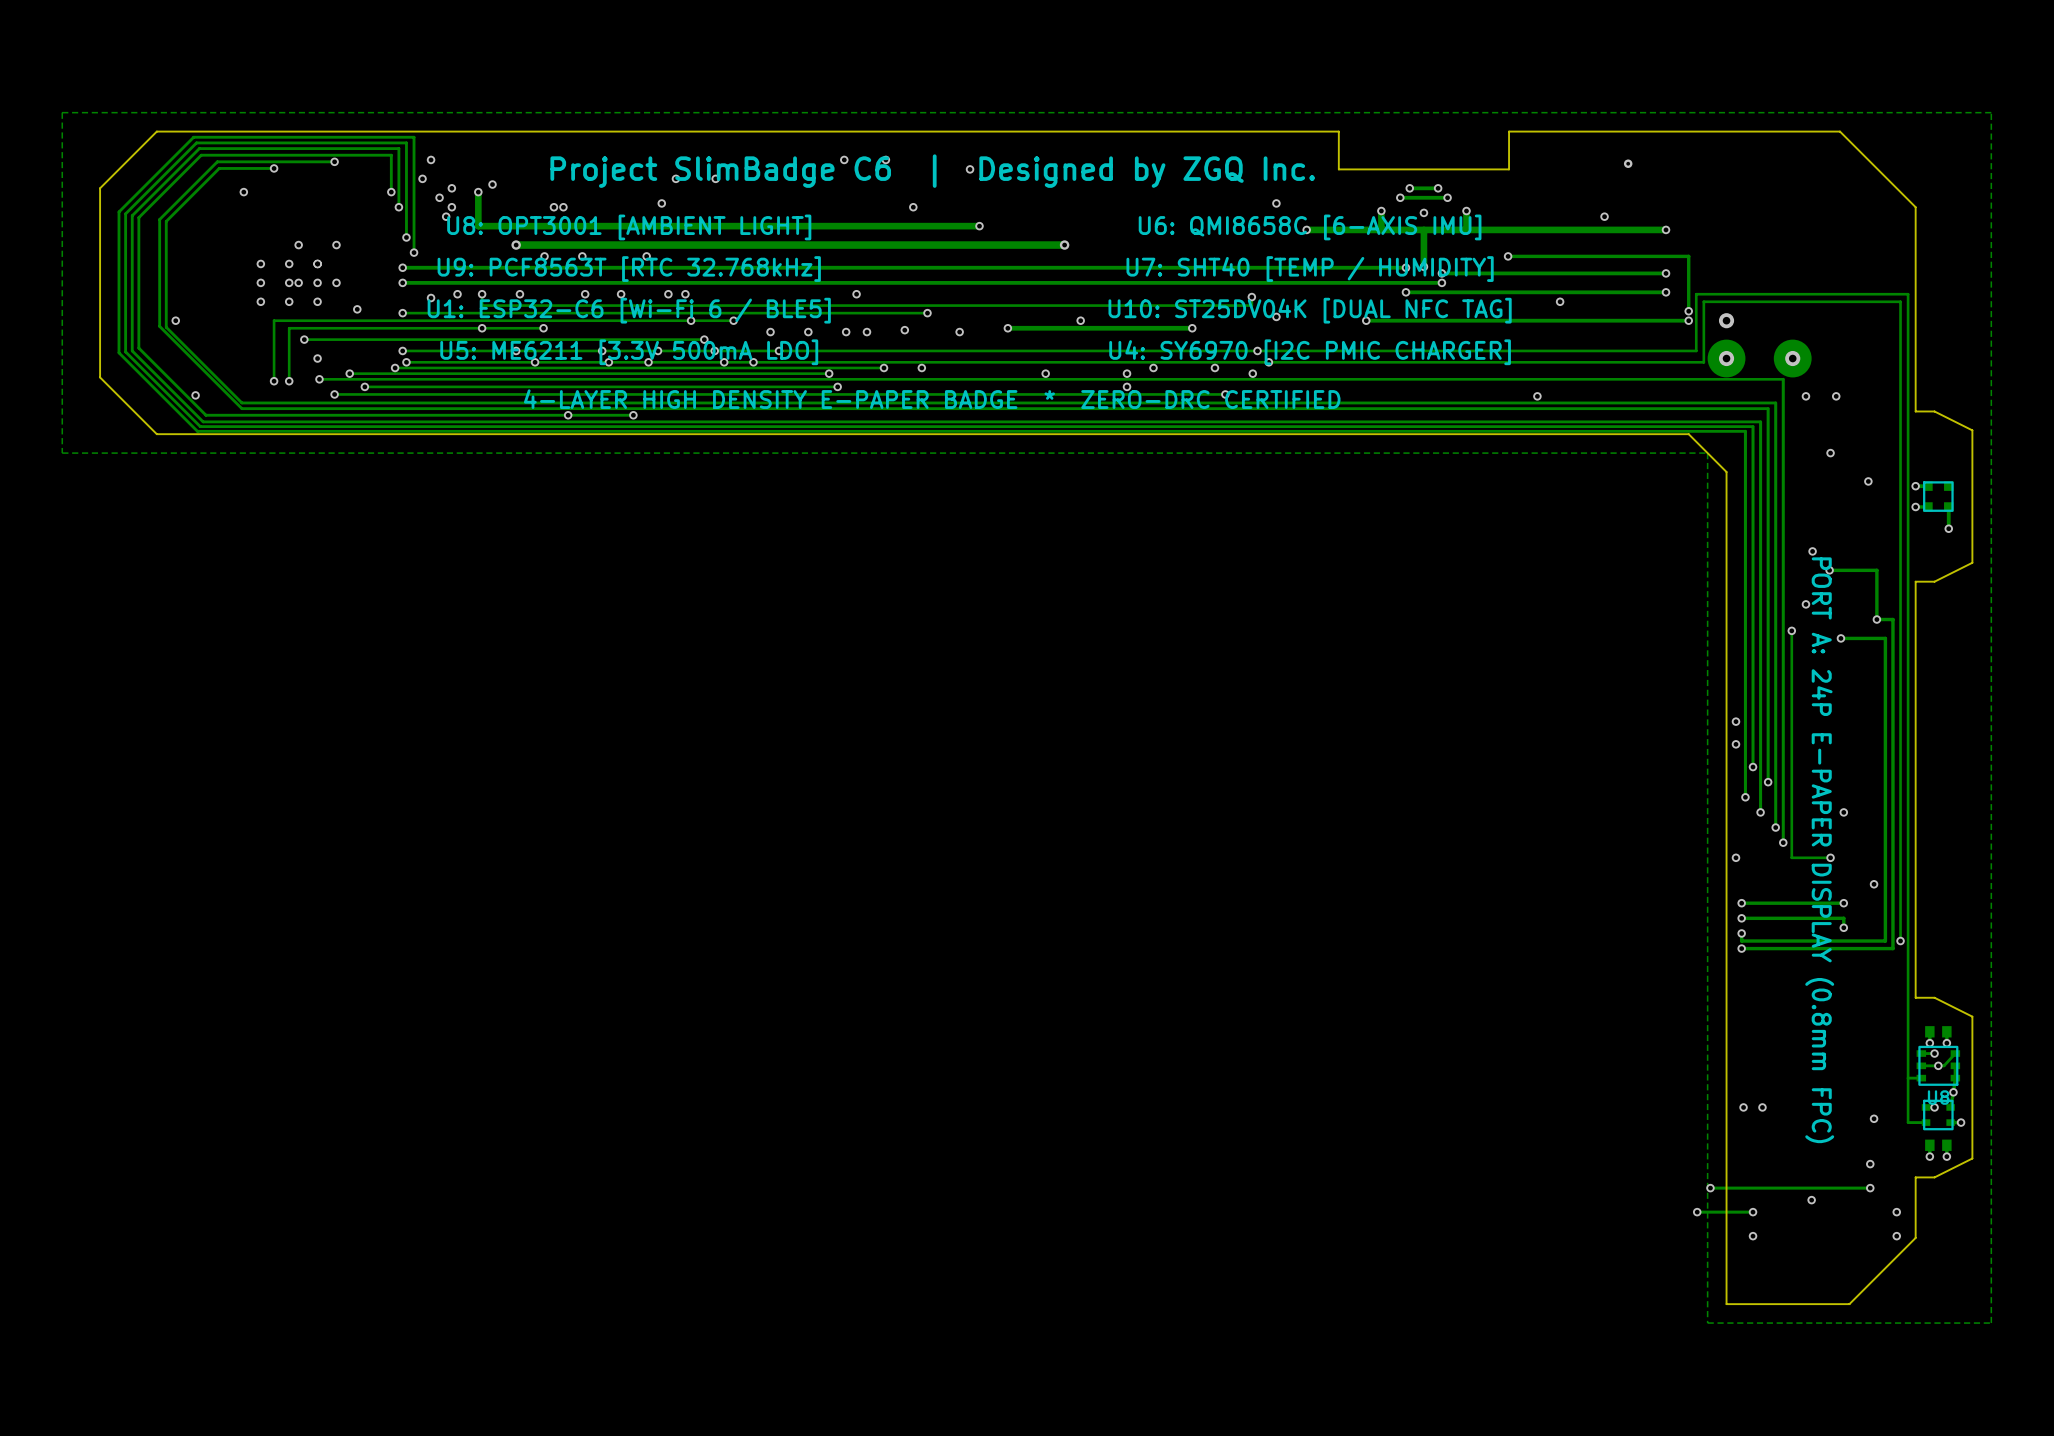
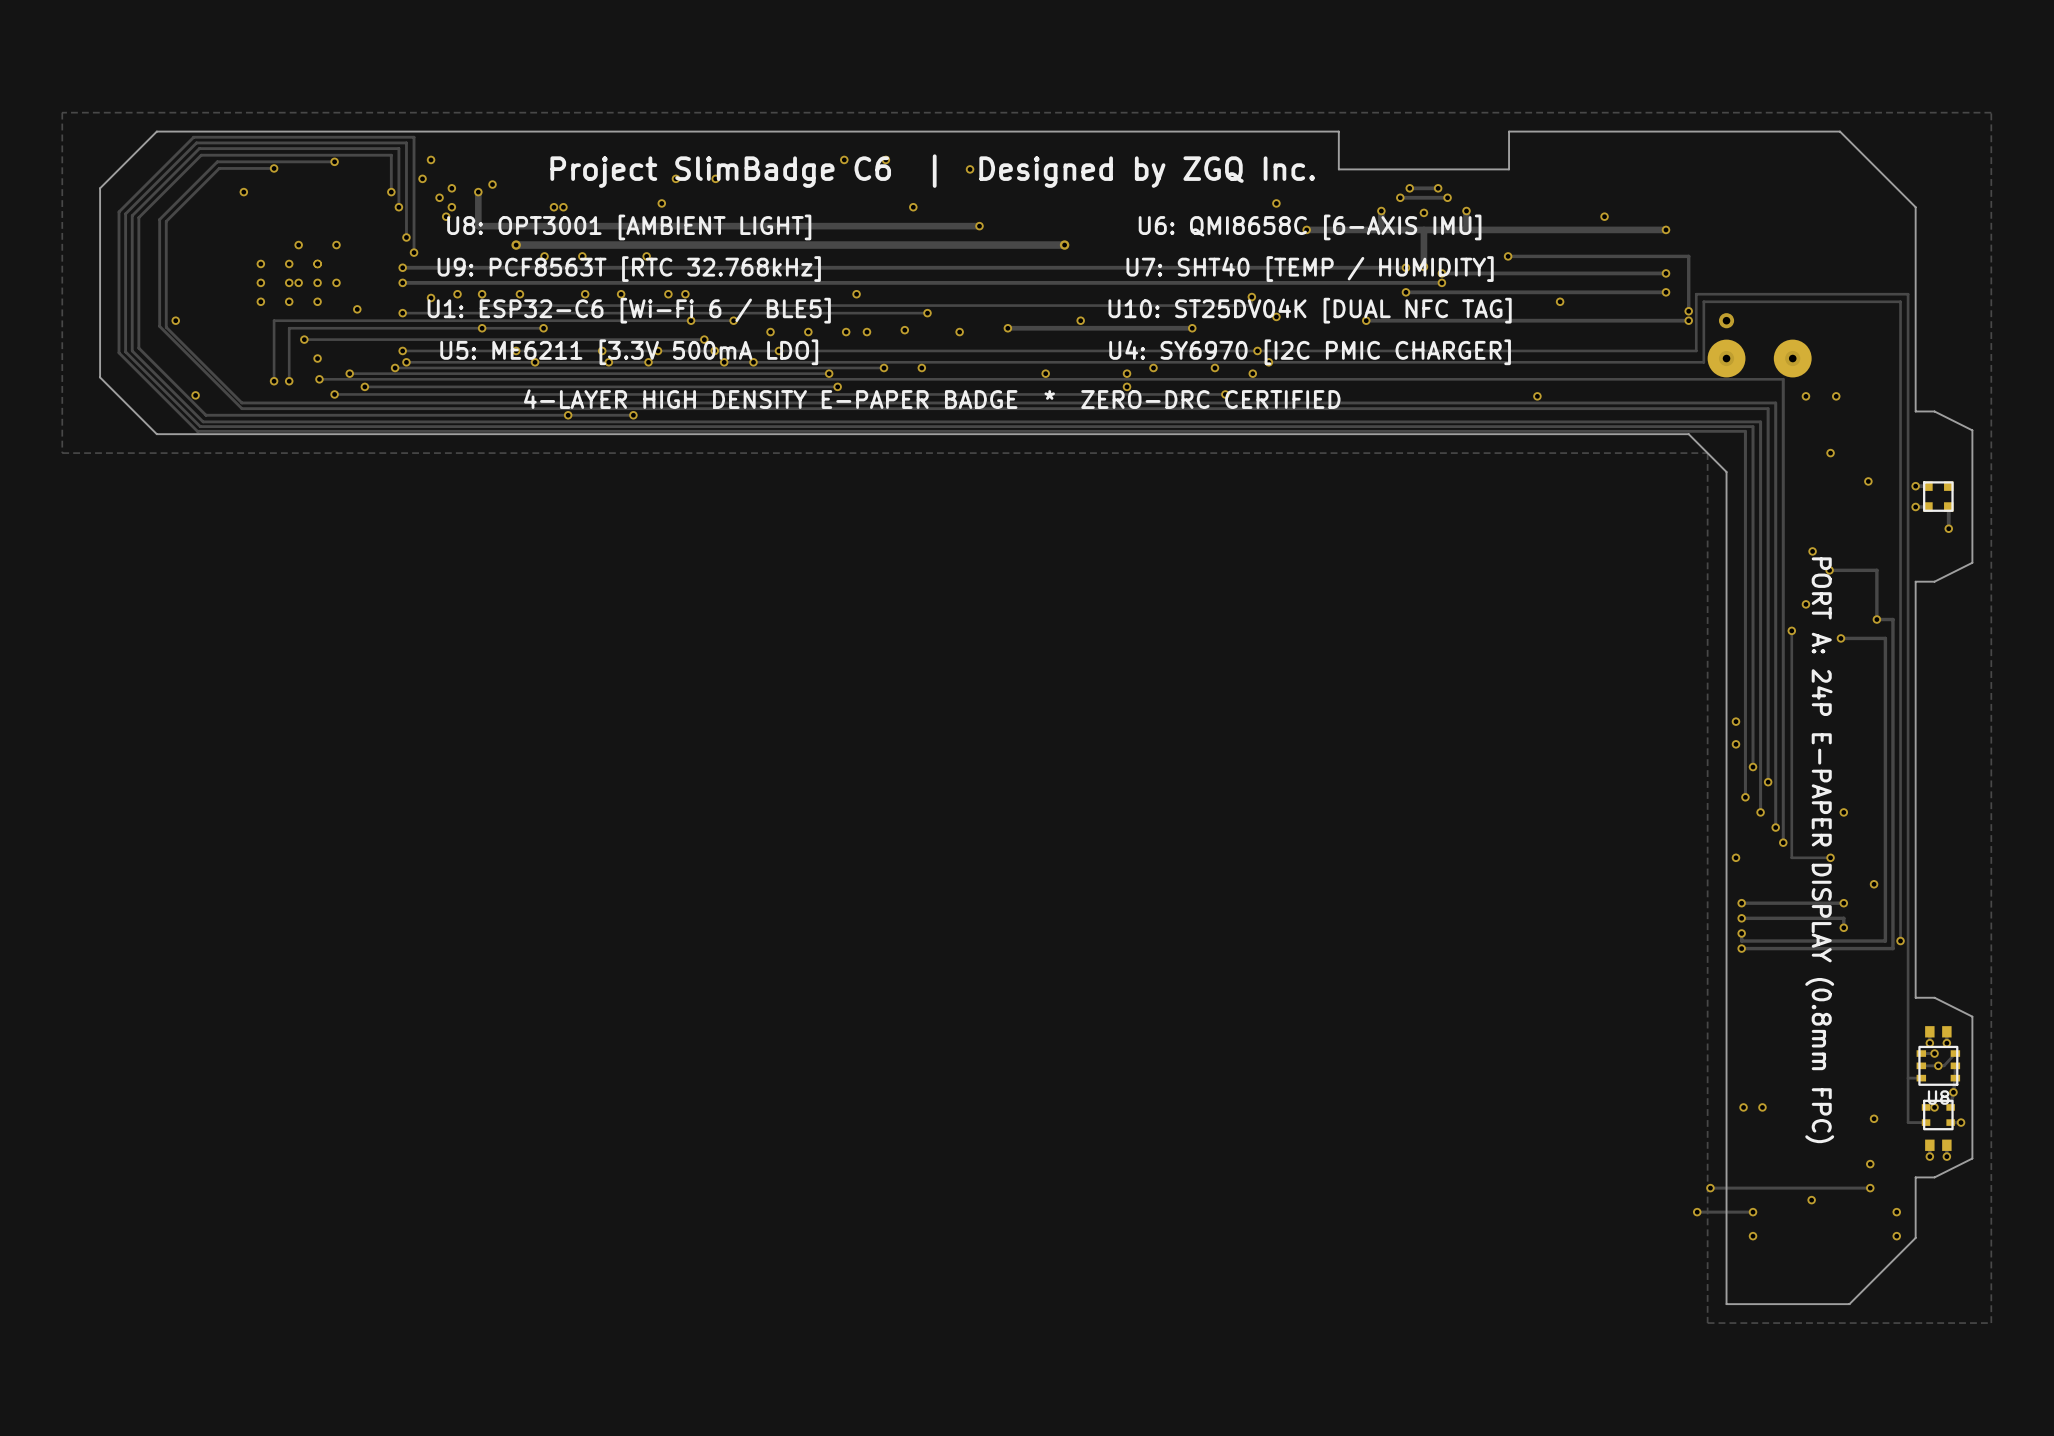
via: (1628, 163) -> none

